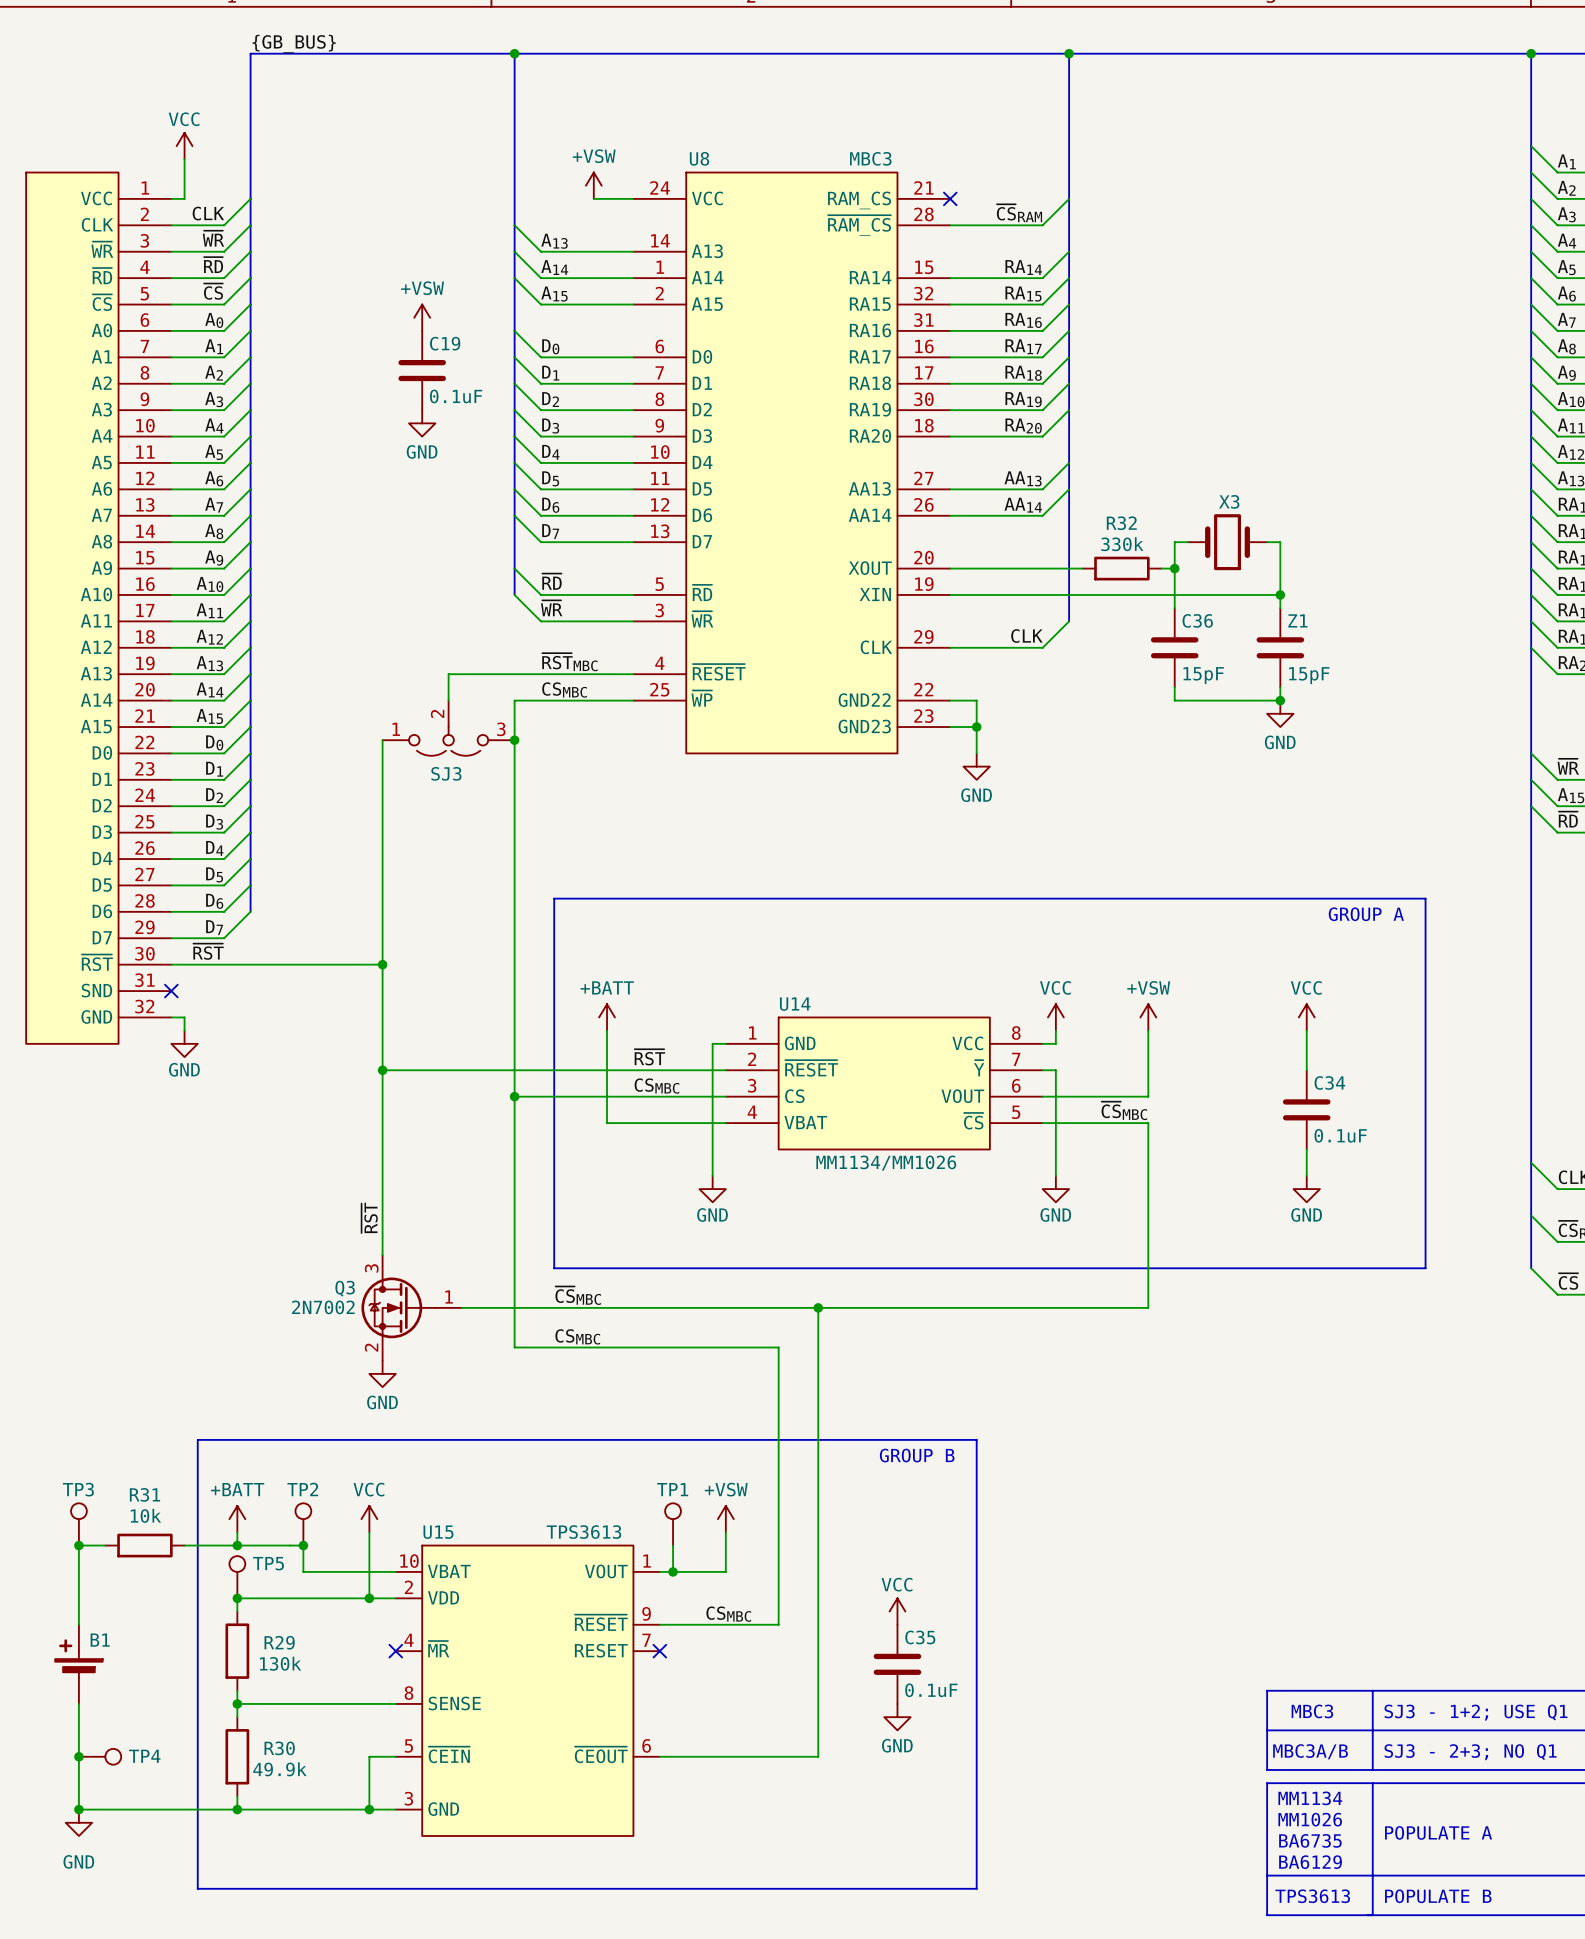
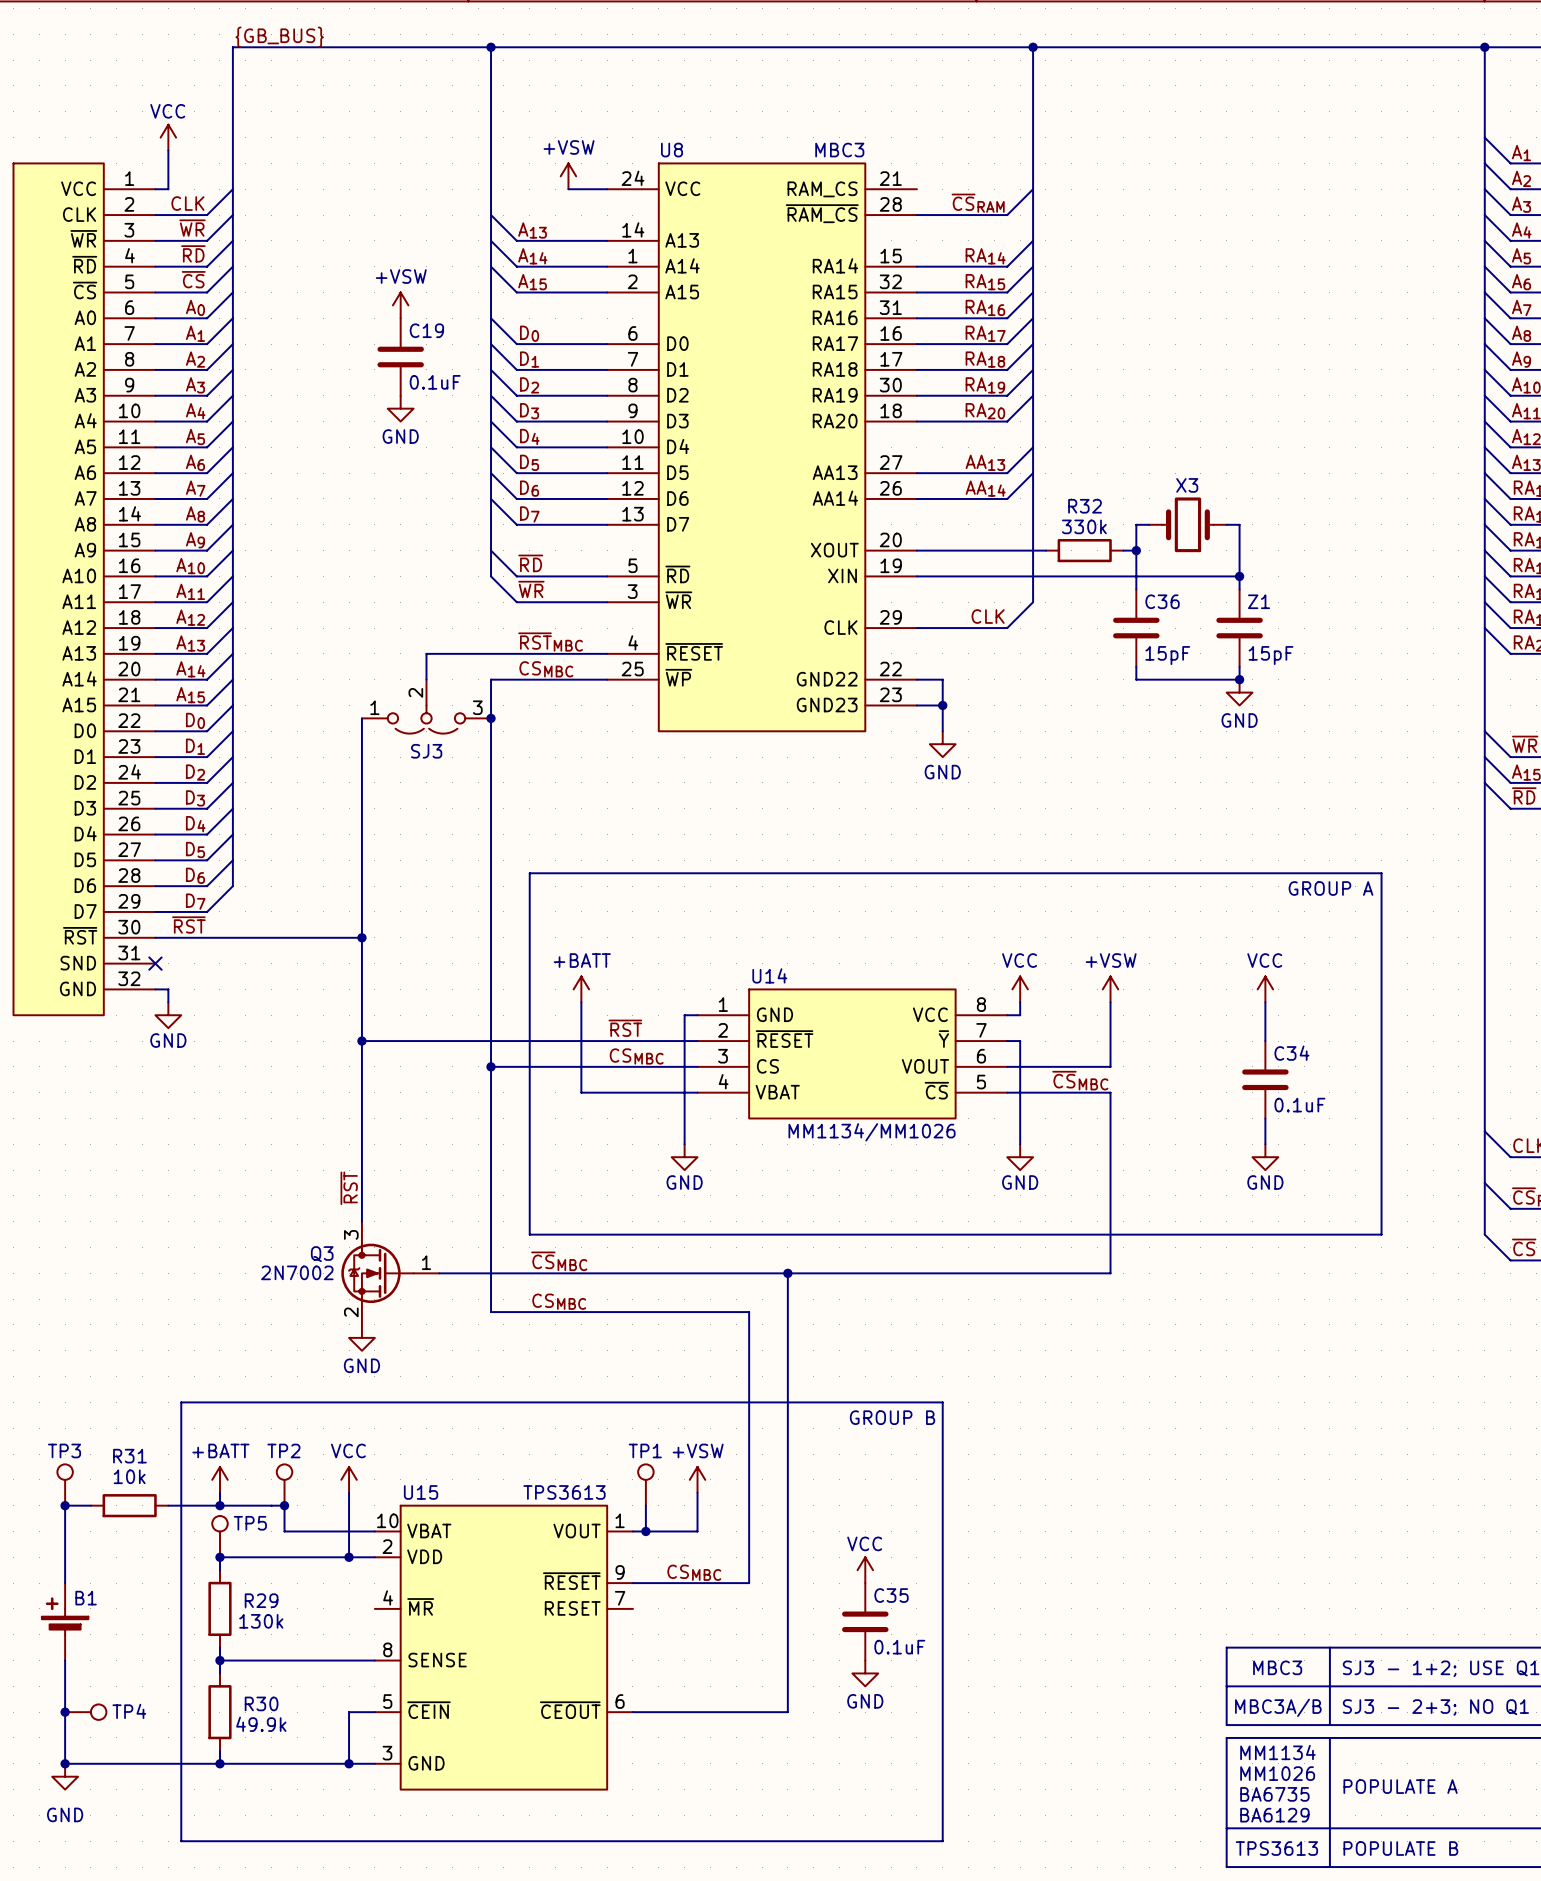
no-connect mark: (950, 198) -> none
no-connect mark: (395, 1651) -> none
no-connect mark: (659, 1651) -> none

